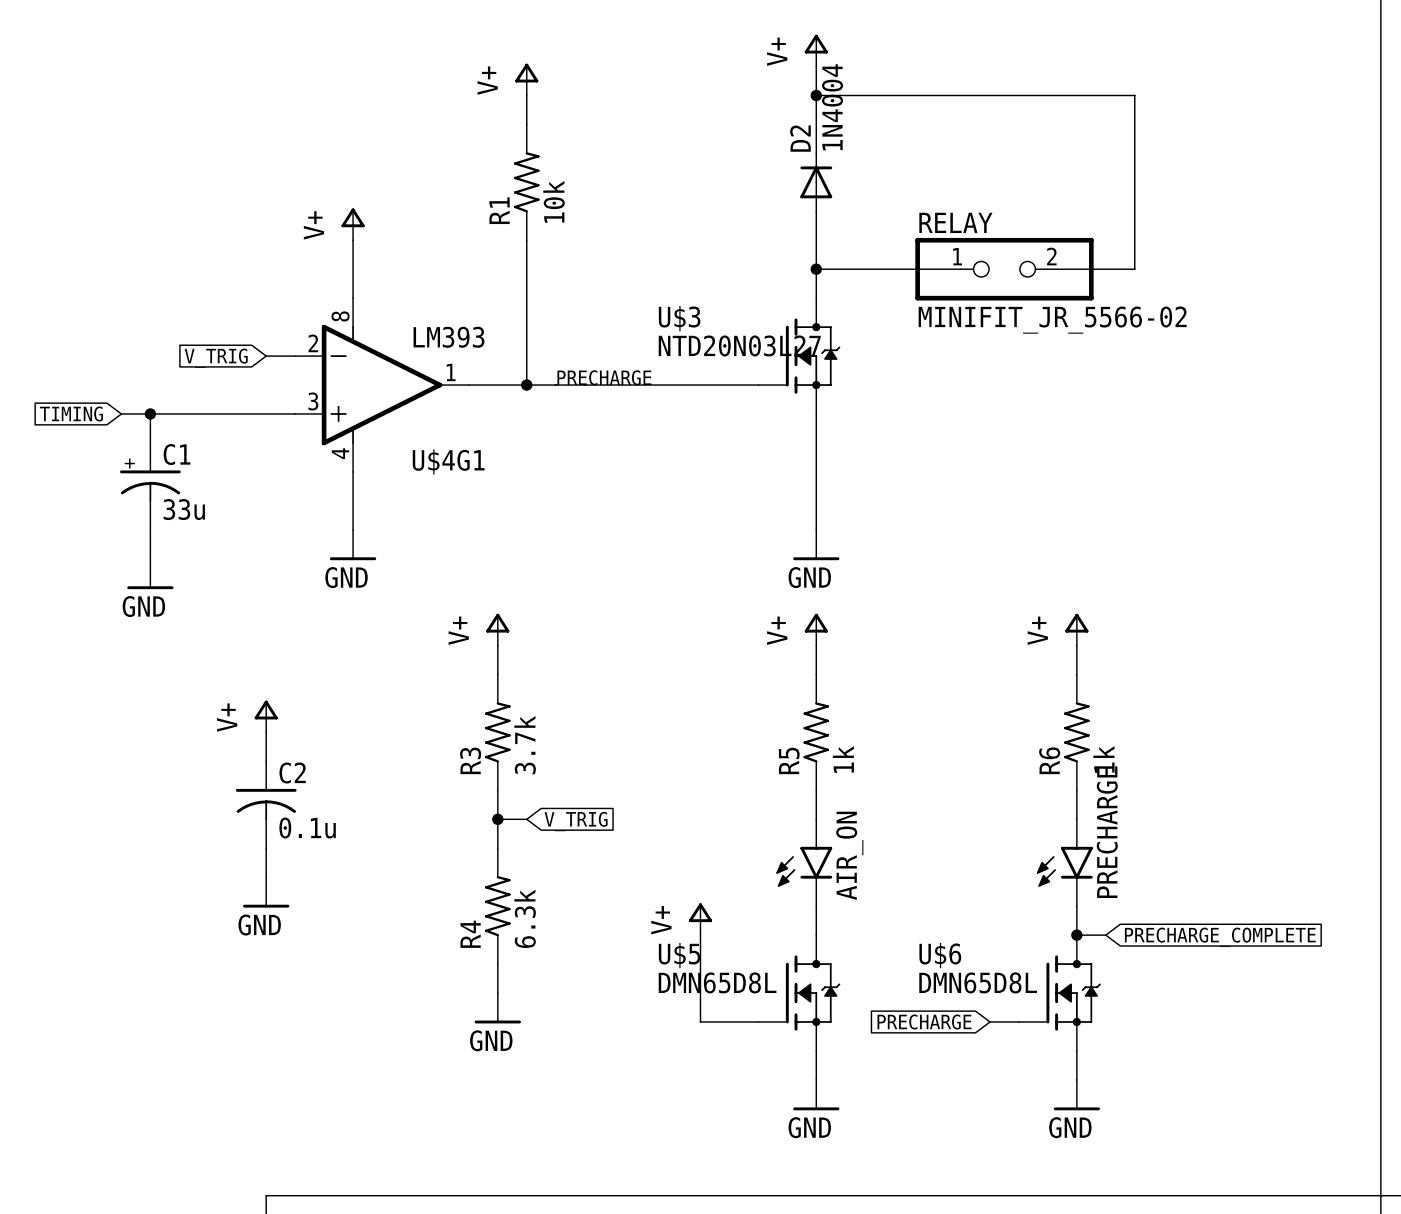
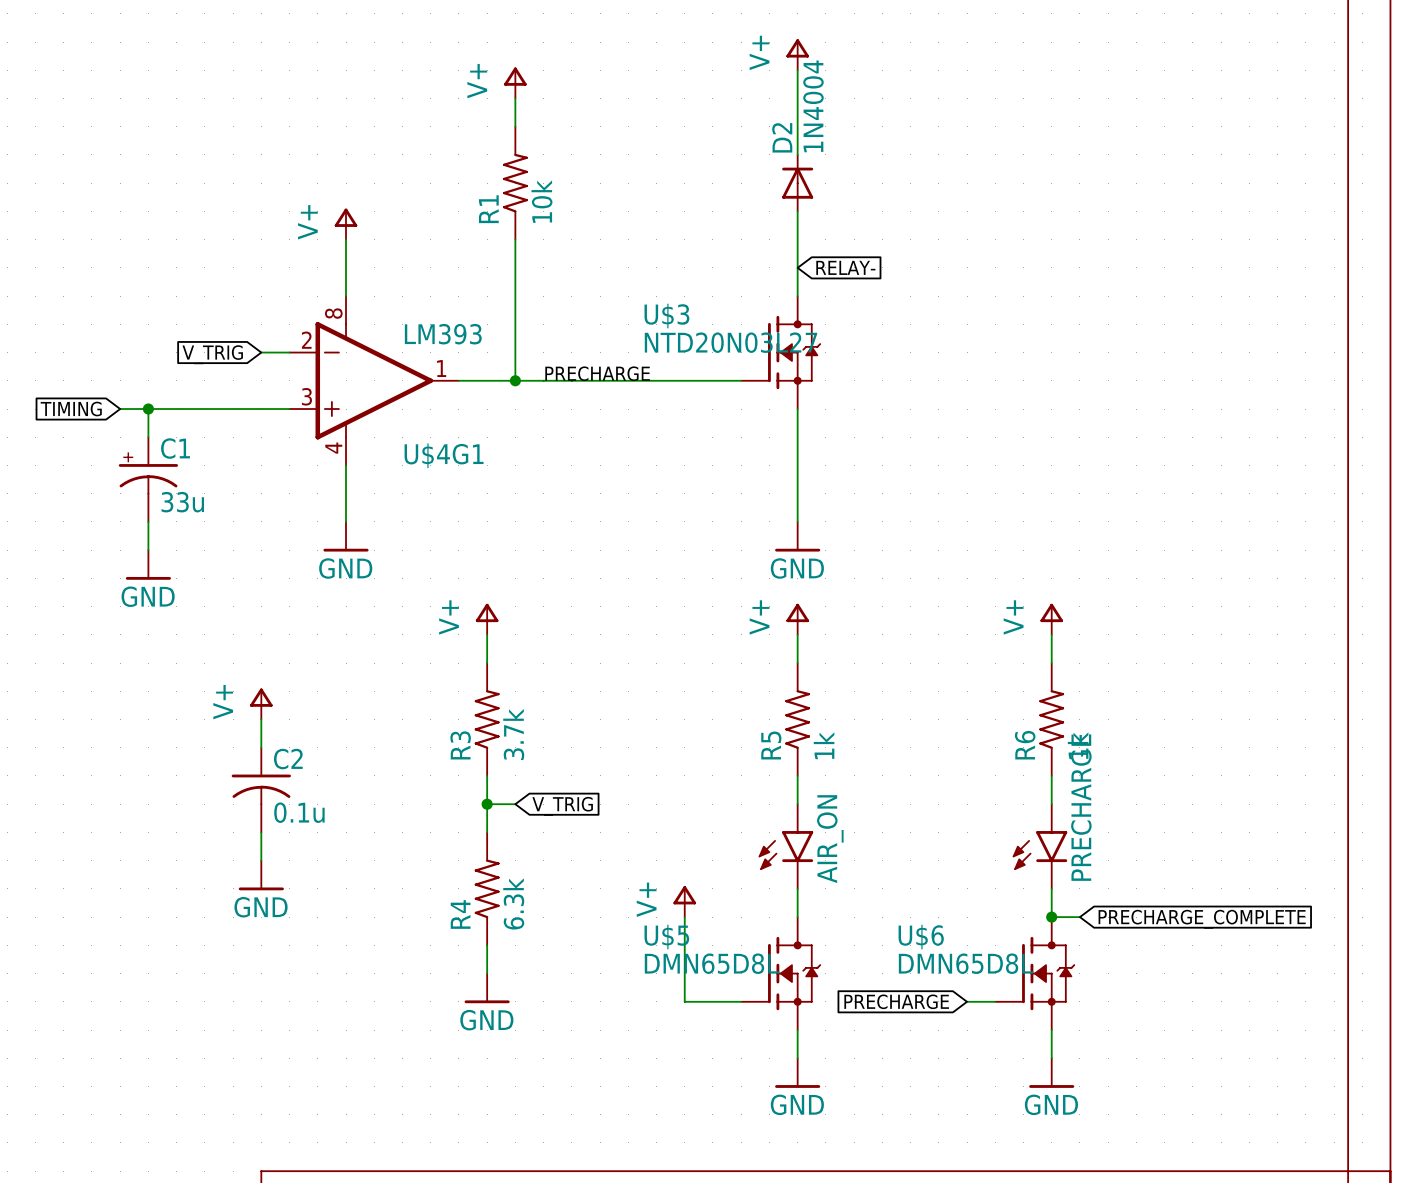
wire: (816, 95) (1134, 95) (1134, 269) (1047, 269) -> none
junction: (816, 95) -> none
wire: (816, 269) (961, 269) -> none
junction: (816, 269) -> none
global label: none -> RELAY- (845, 267)
RELAY: MINIFIT_JR_5566-02 (1004, 269) -> none

